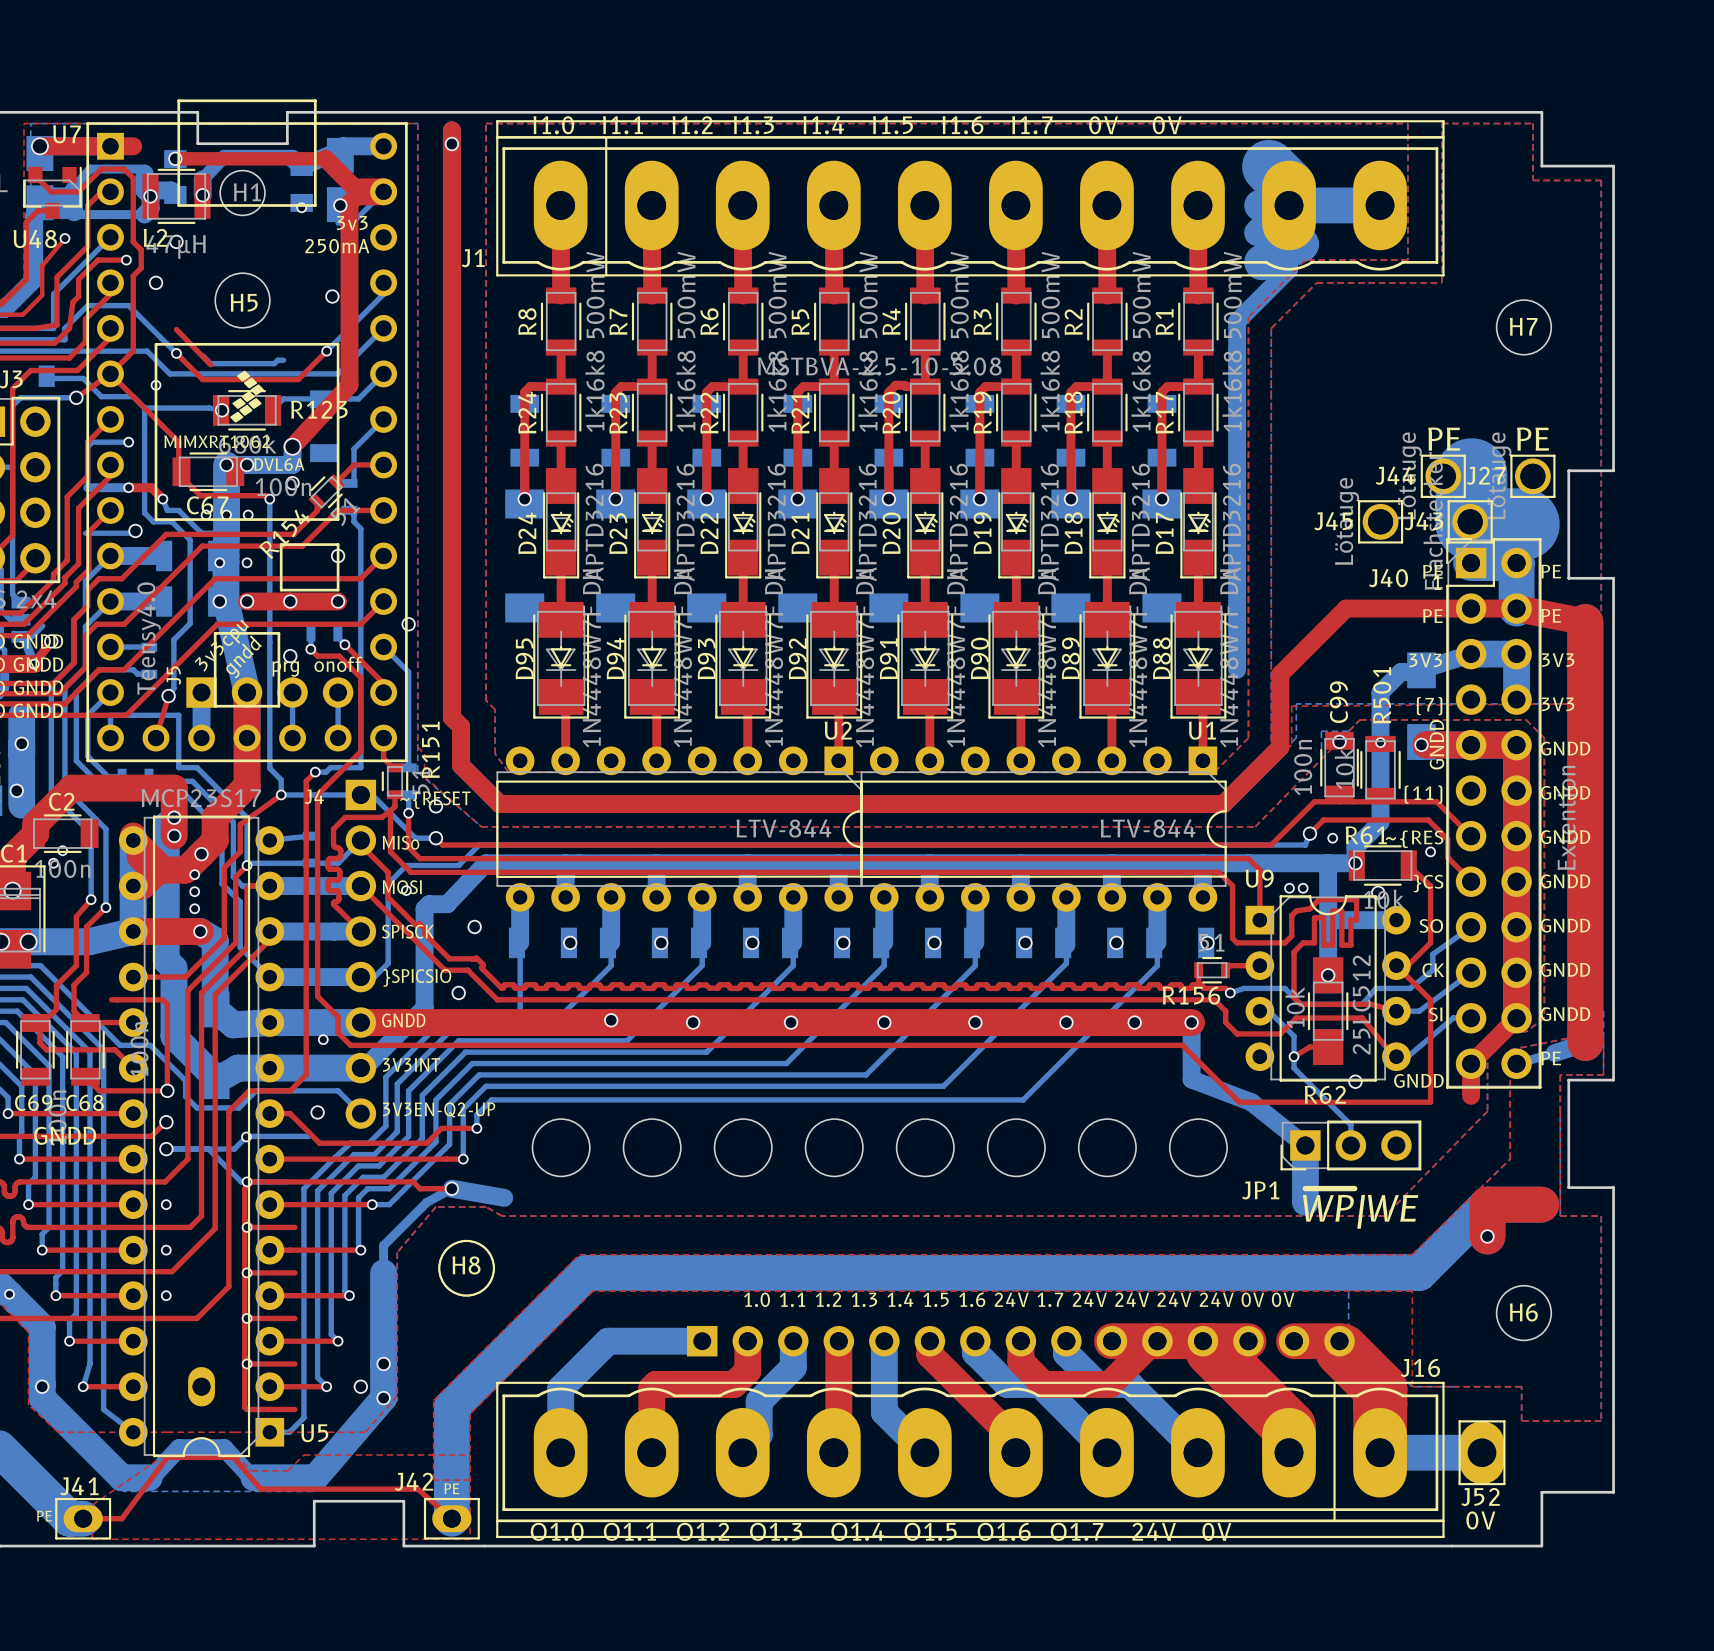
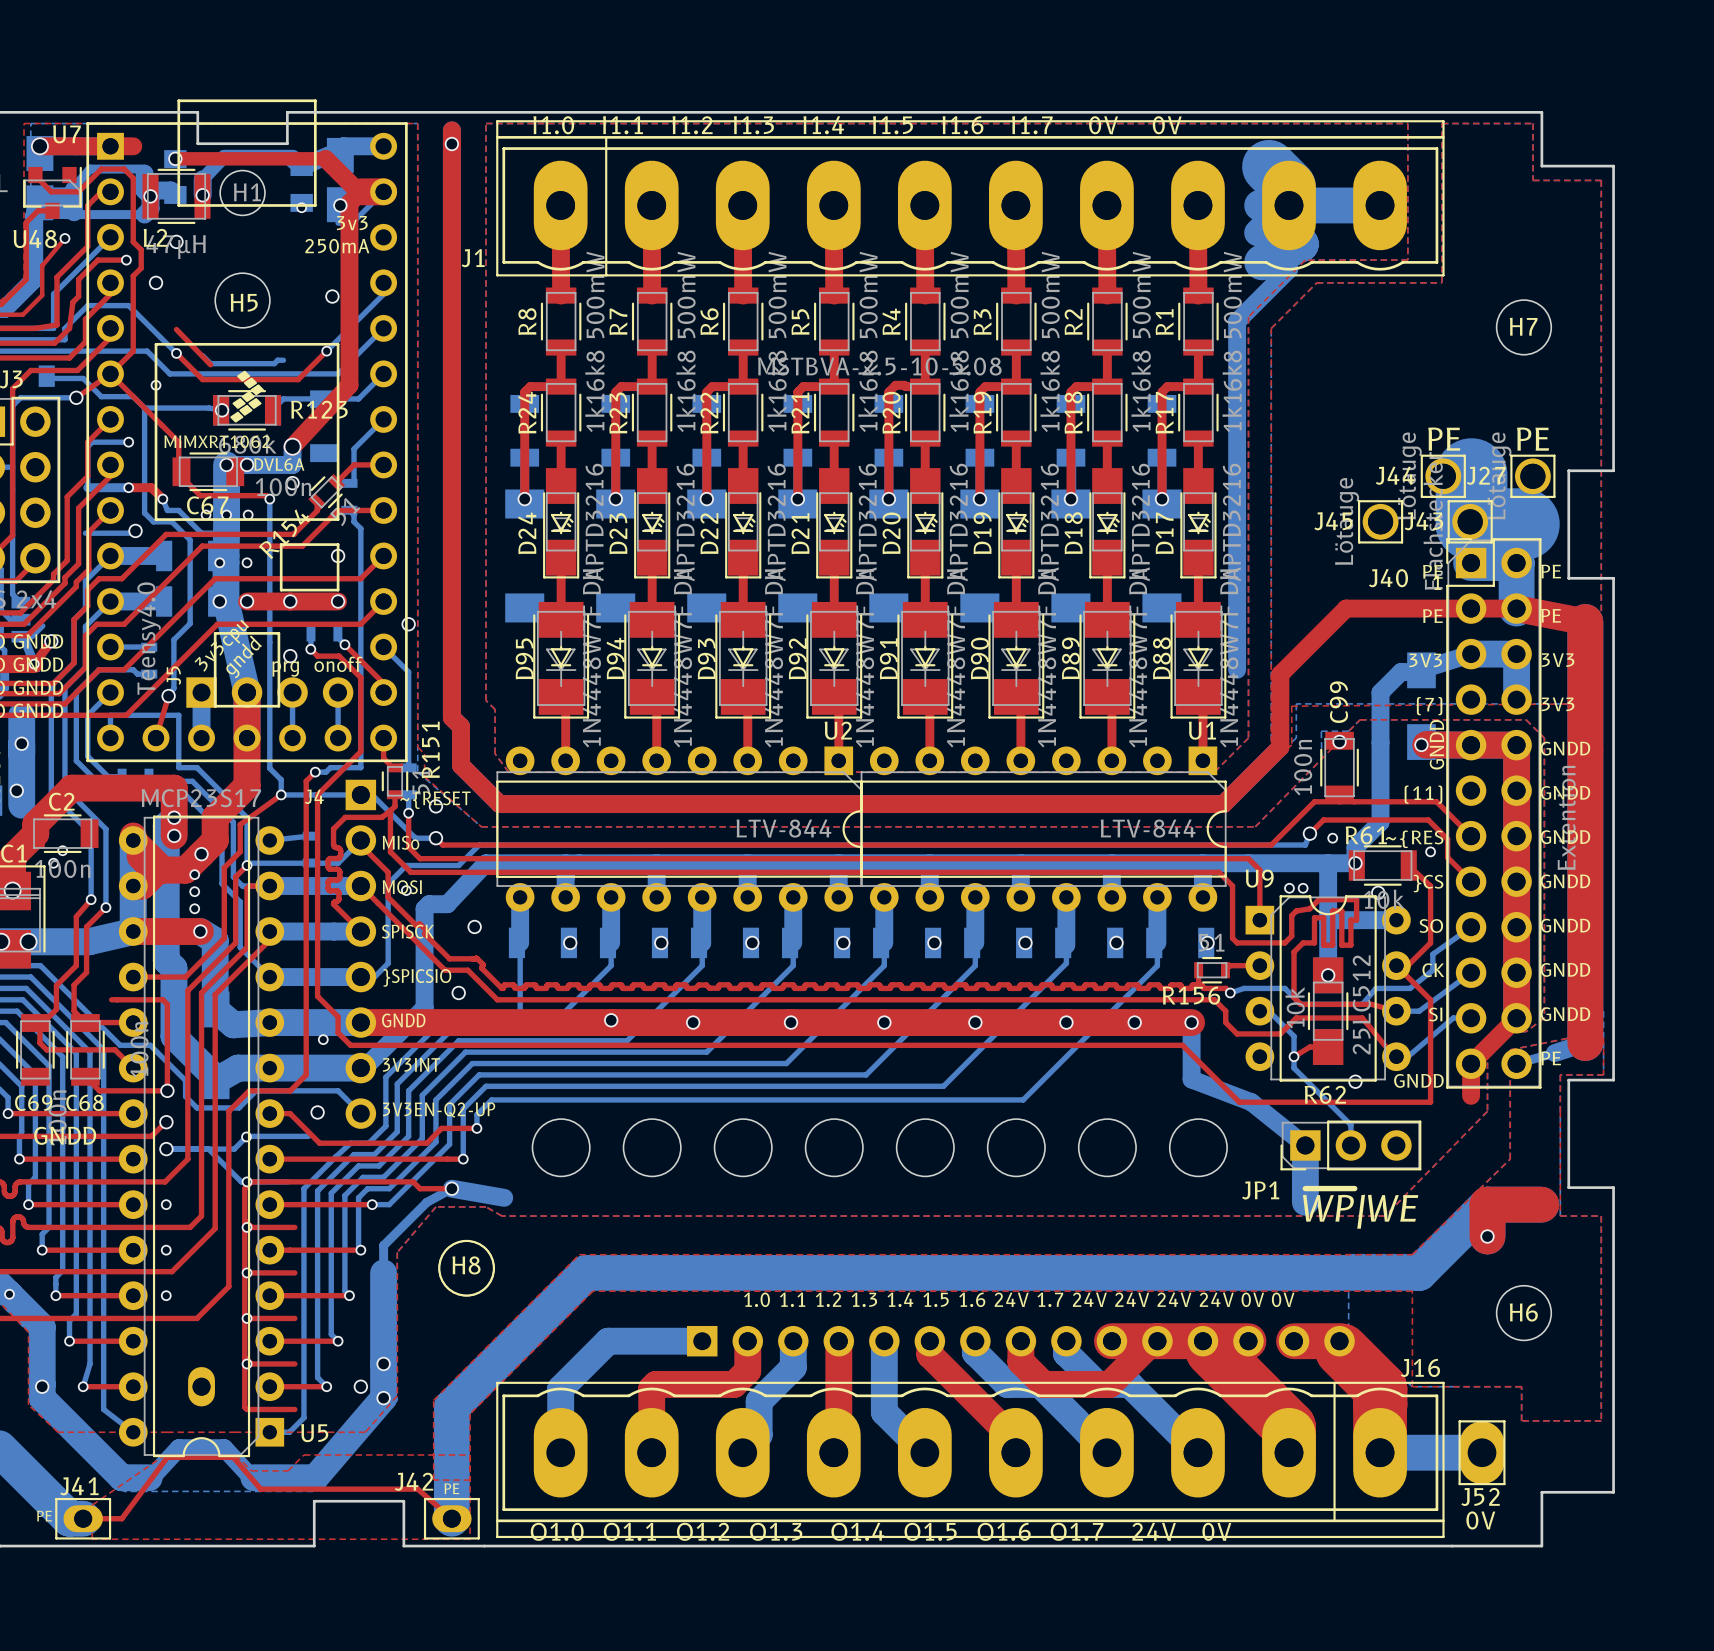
via: (1380, 742) -> none
R501: 10k (1380, 769) -> none

